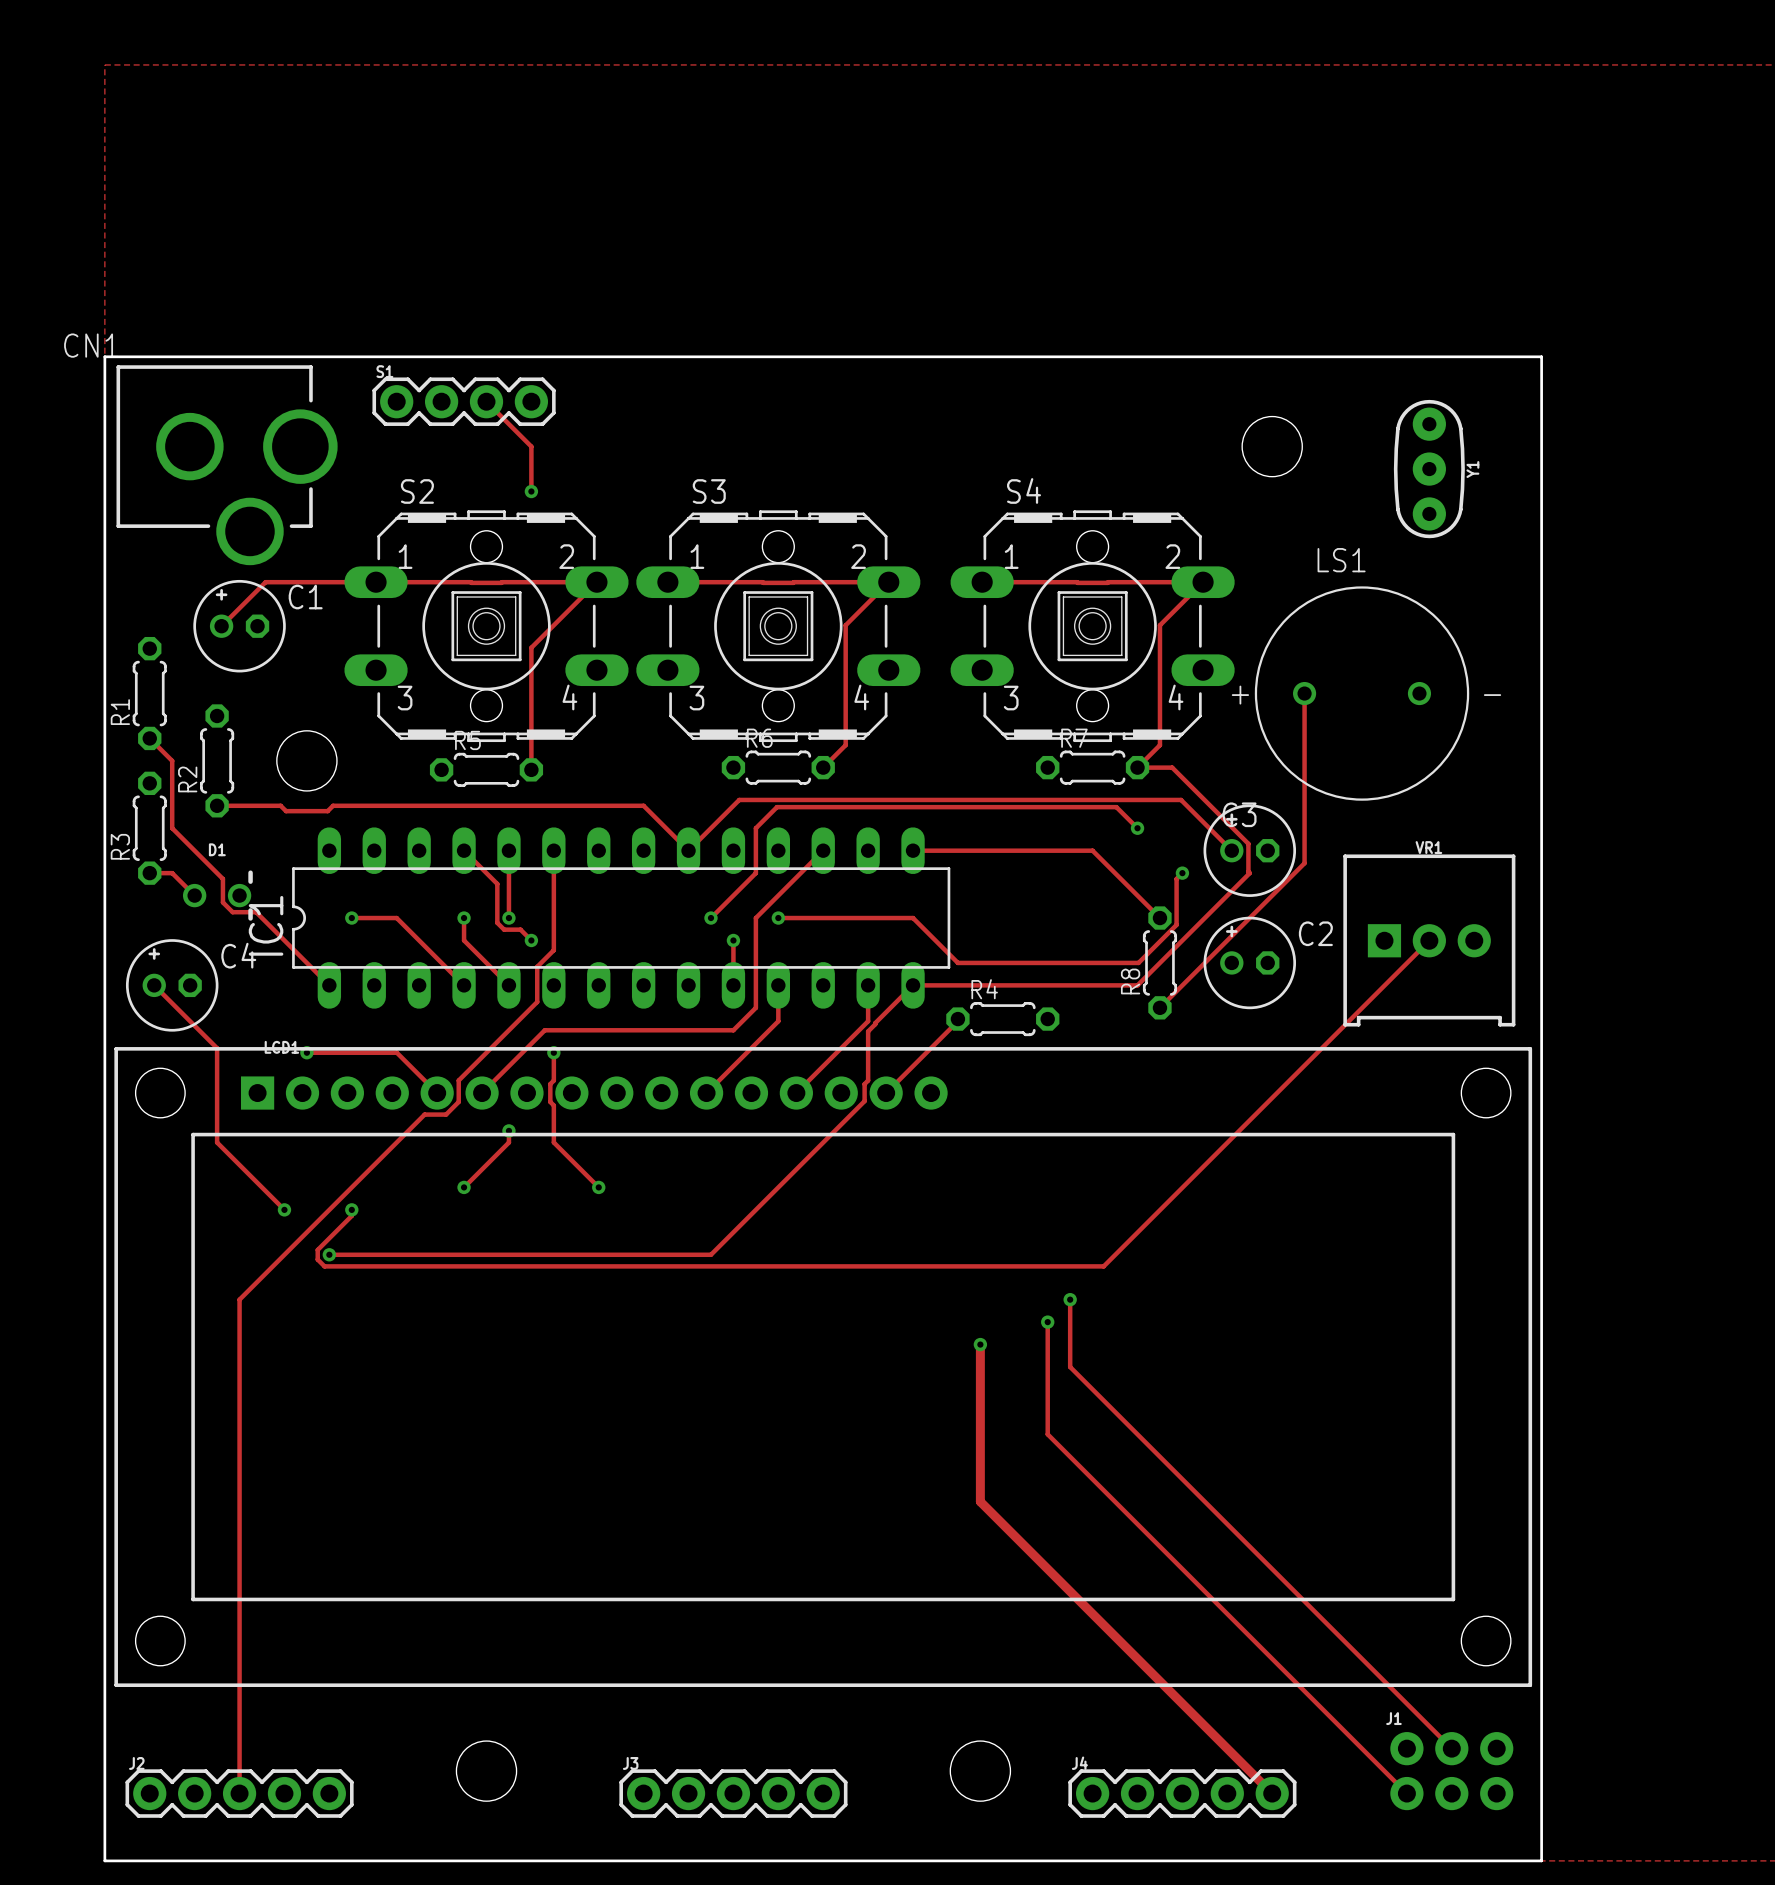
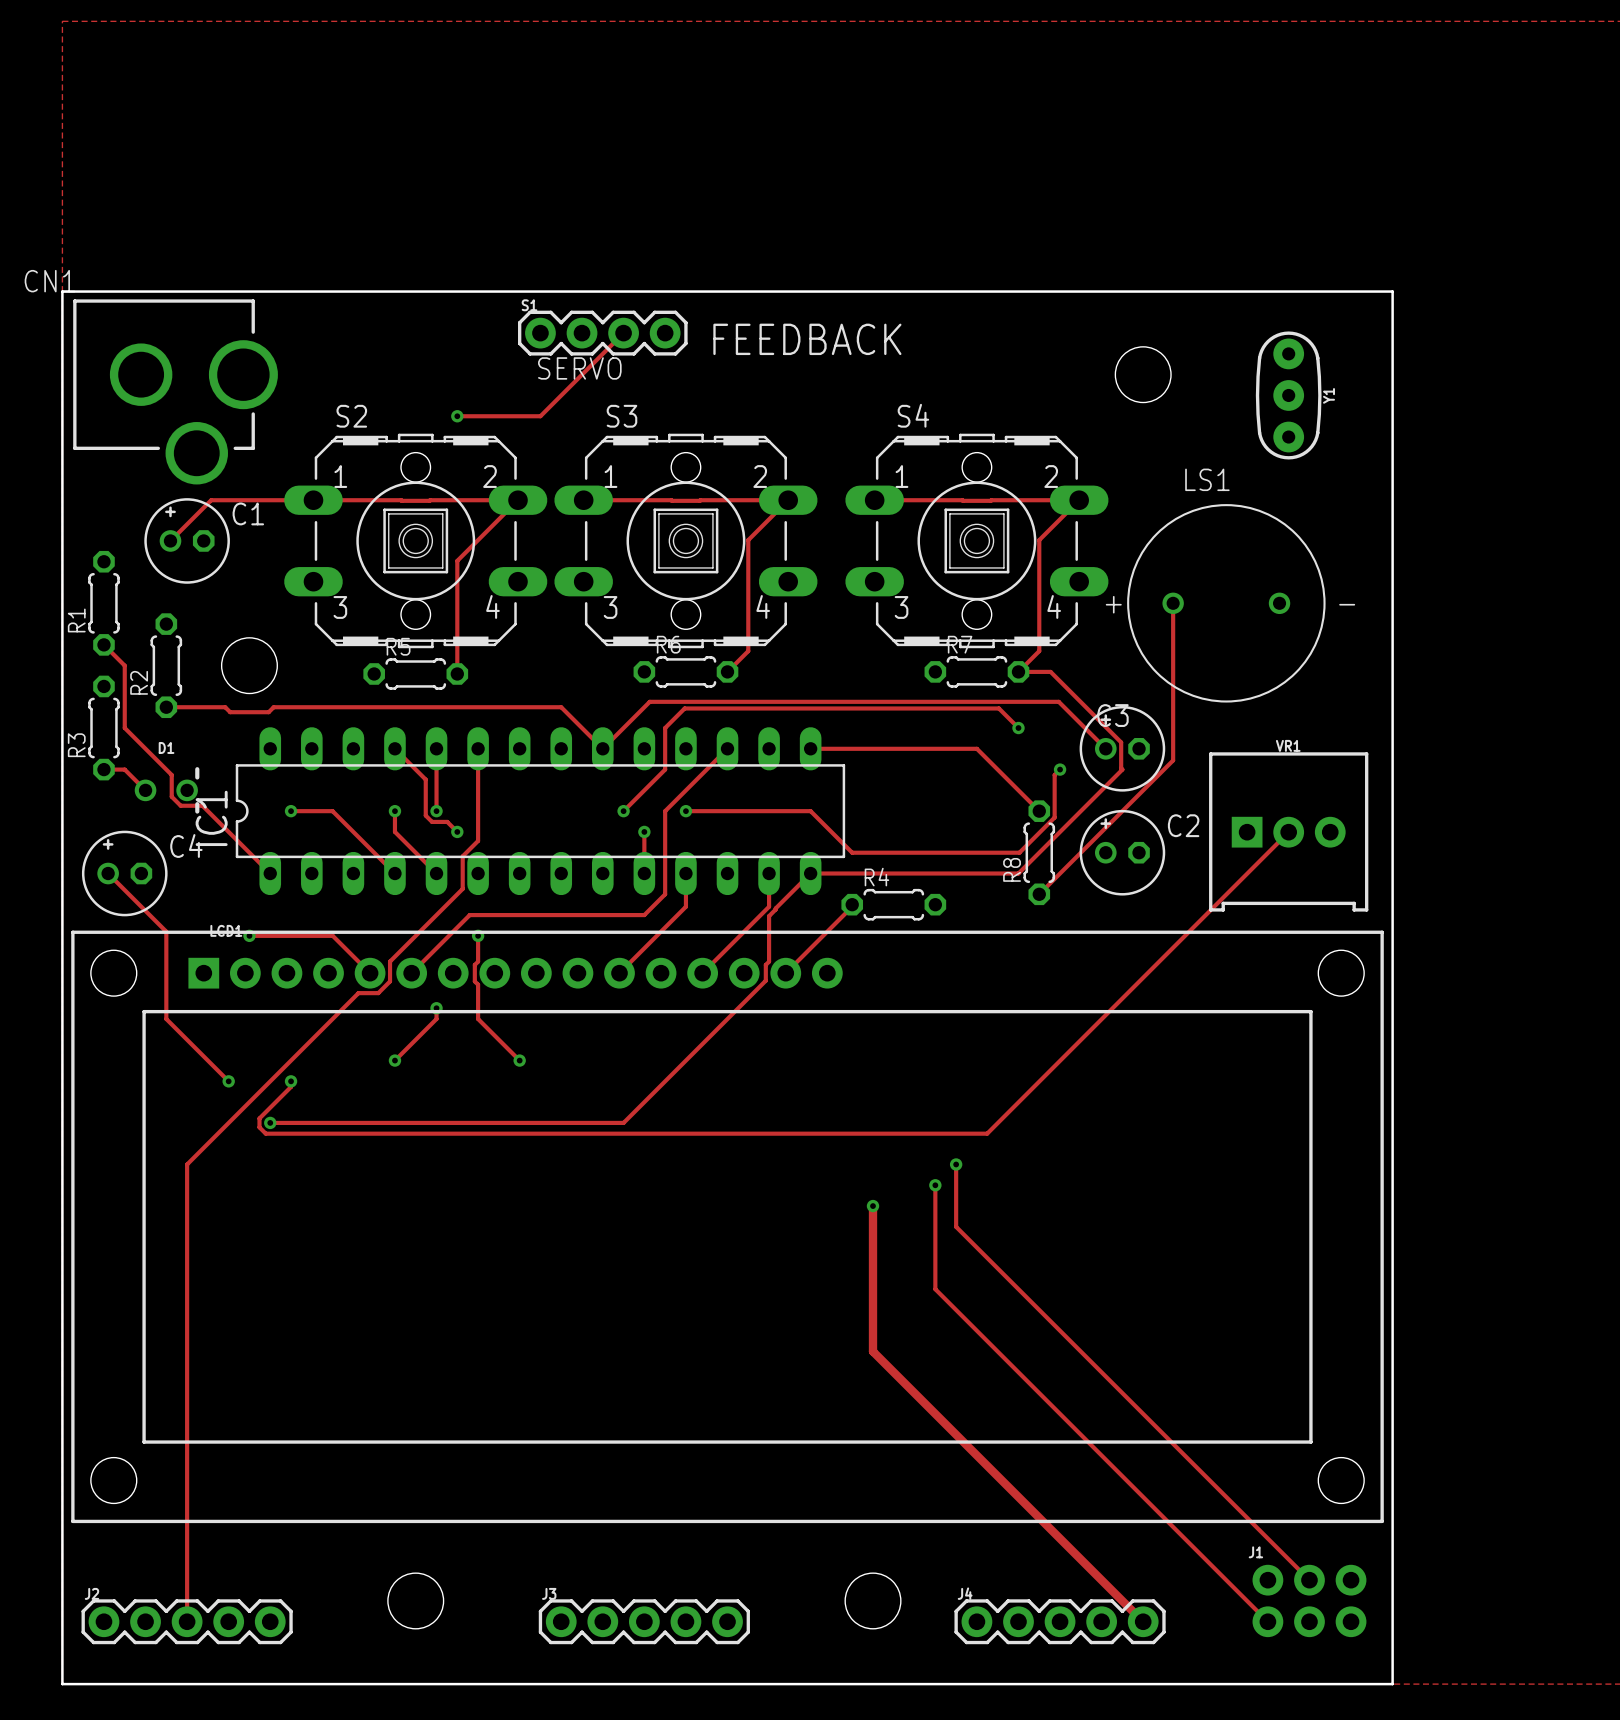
S1 position: (464, 401) -> (602, 333)
track: (486, 401) (531, 446) (531, 491) -> (623, 333) (540, 416) (457, 416)
text: none -> FEEDBACK (807, 339)
text: none -> SERVO (579, 368)

